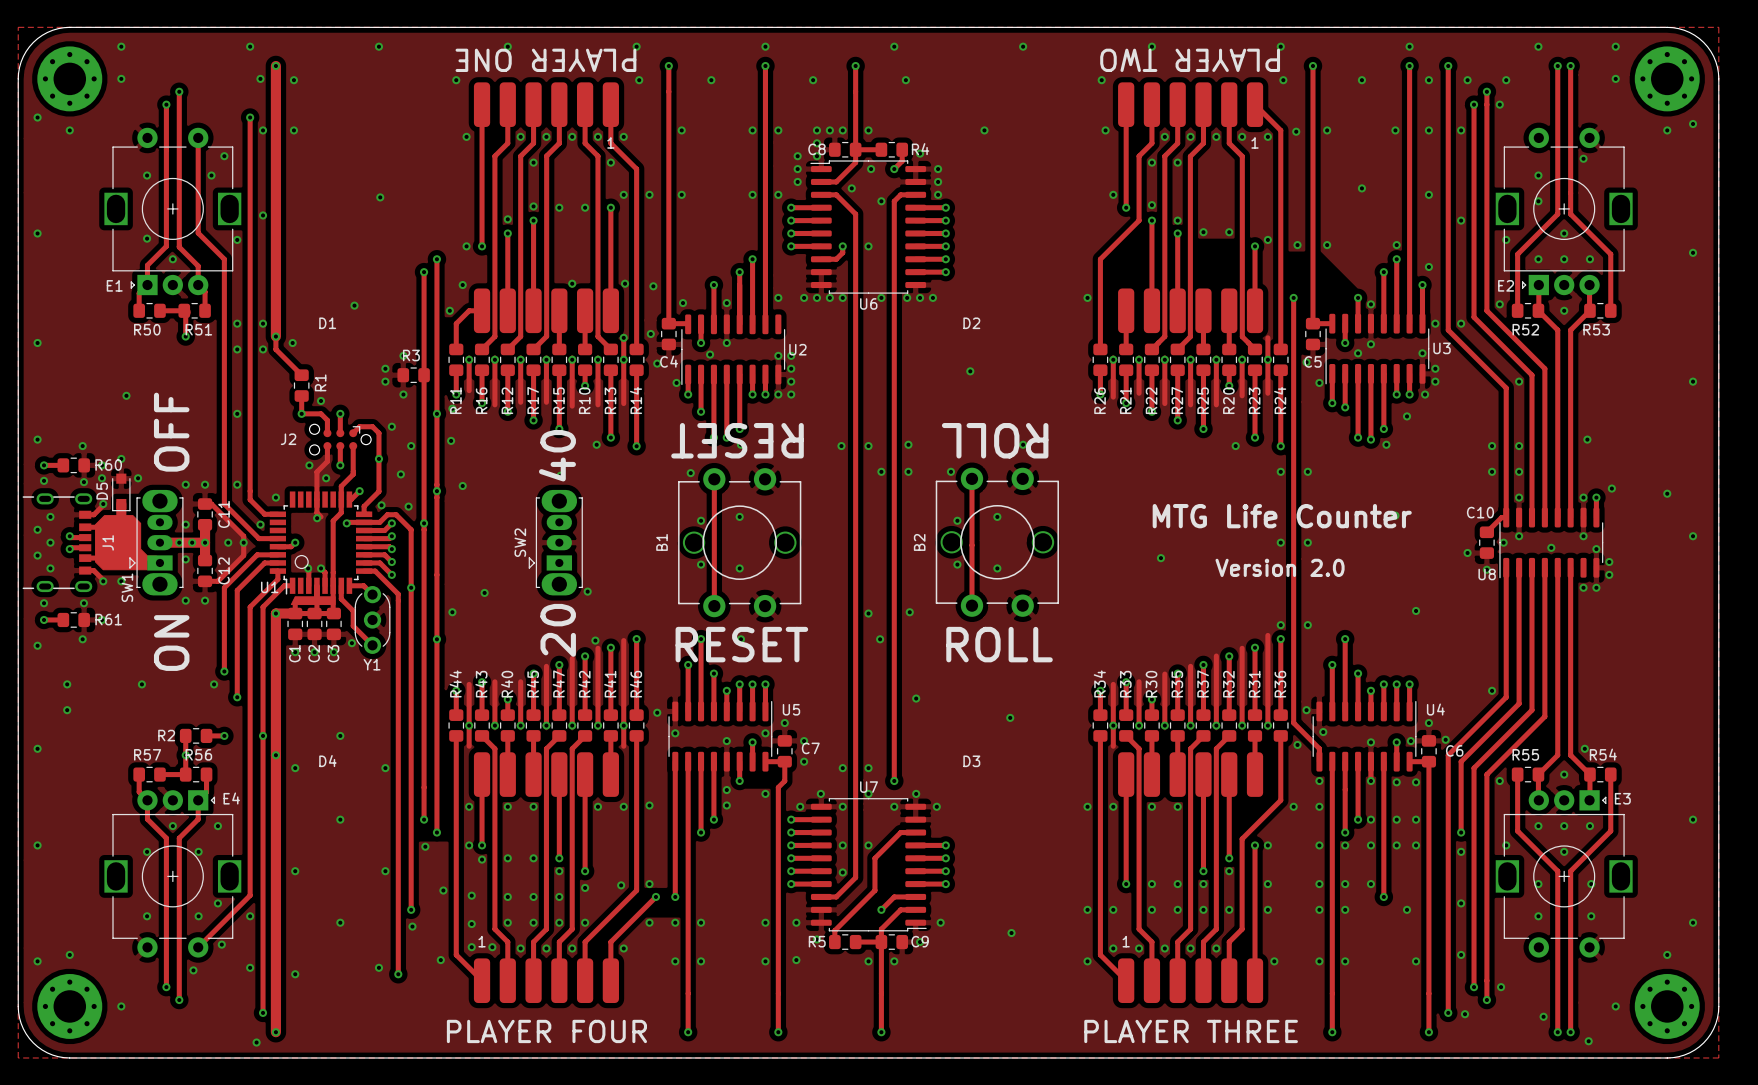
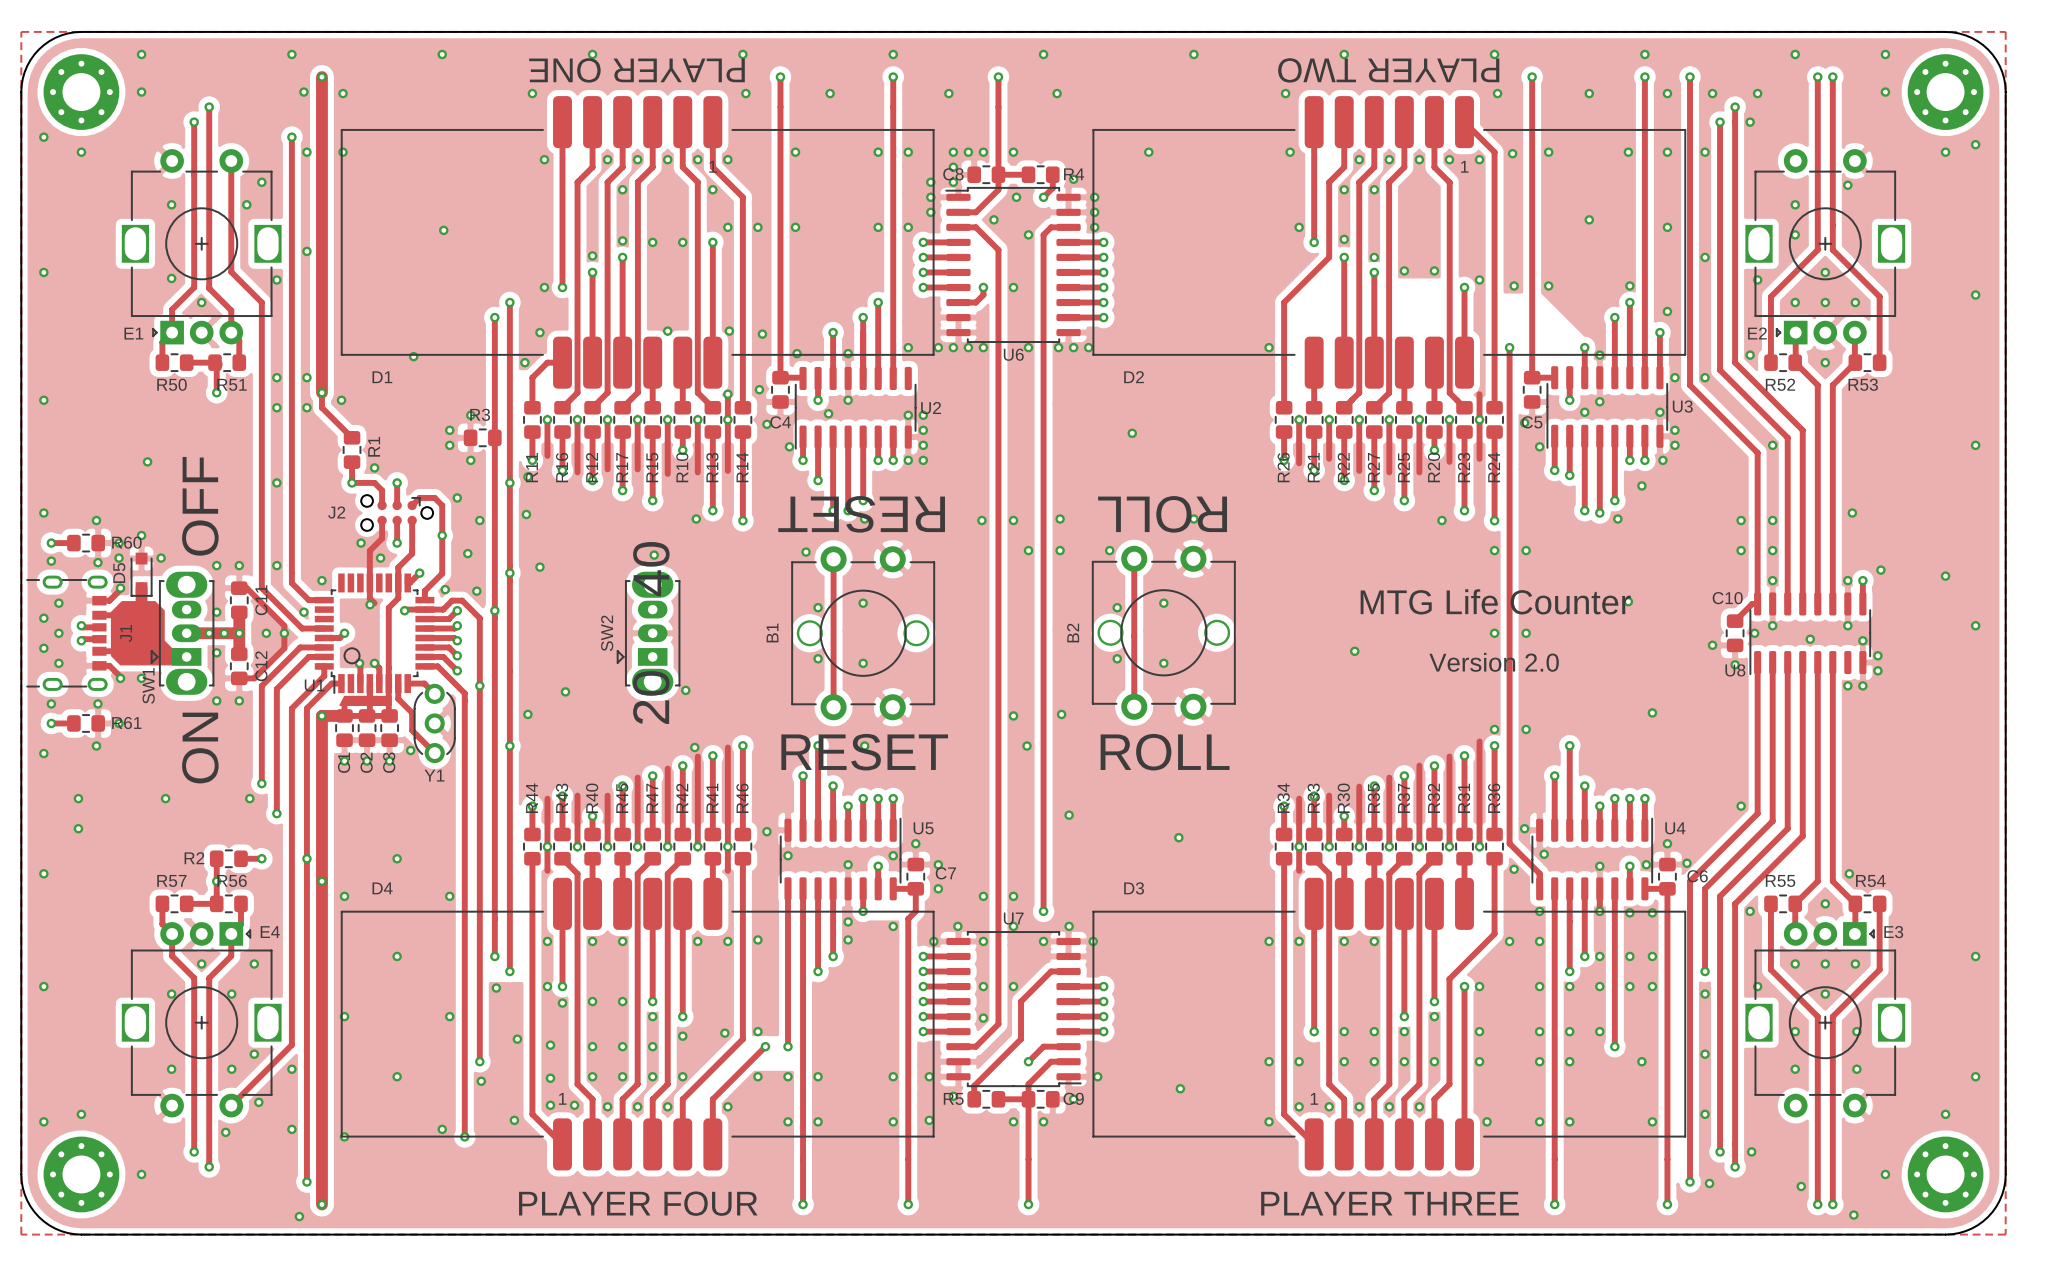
D1 footprint: [473, 82, 619, 334] -> [340, 96, 935, 389]
D2 footprint: [1118, 82, 1264, 334] -> [1092, 96, 1687, 389]
D4 footprint: [473, 752, 619, 1004] -> [340, 877, 935, 1171]
D3 footprint: [1118, 752, 1264, 1004] -> [1092, 877, 1687, 1171]

